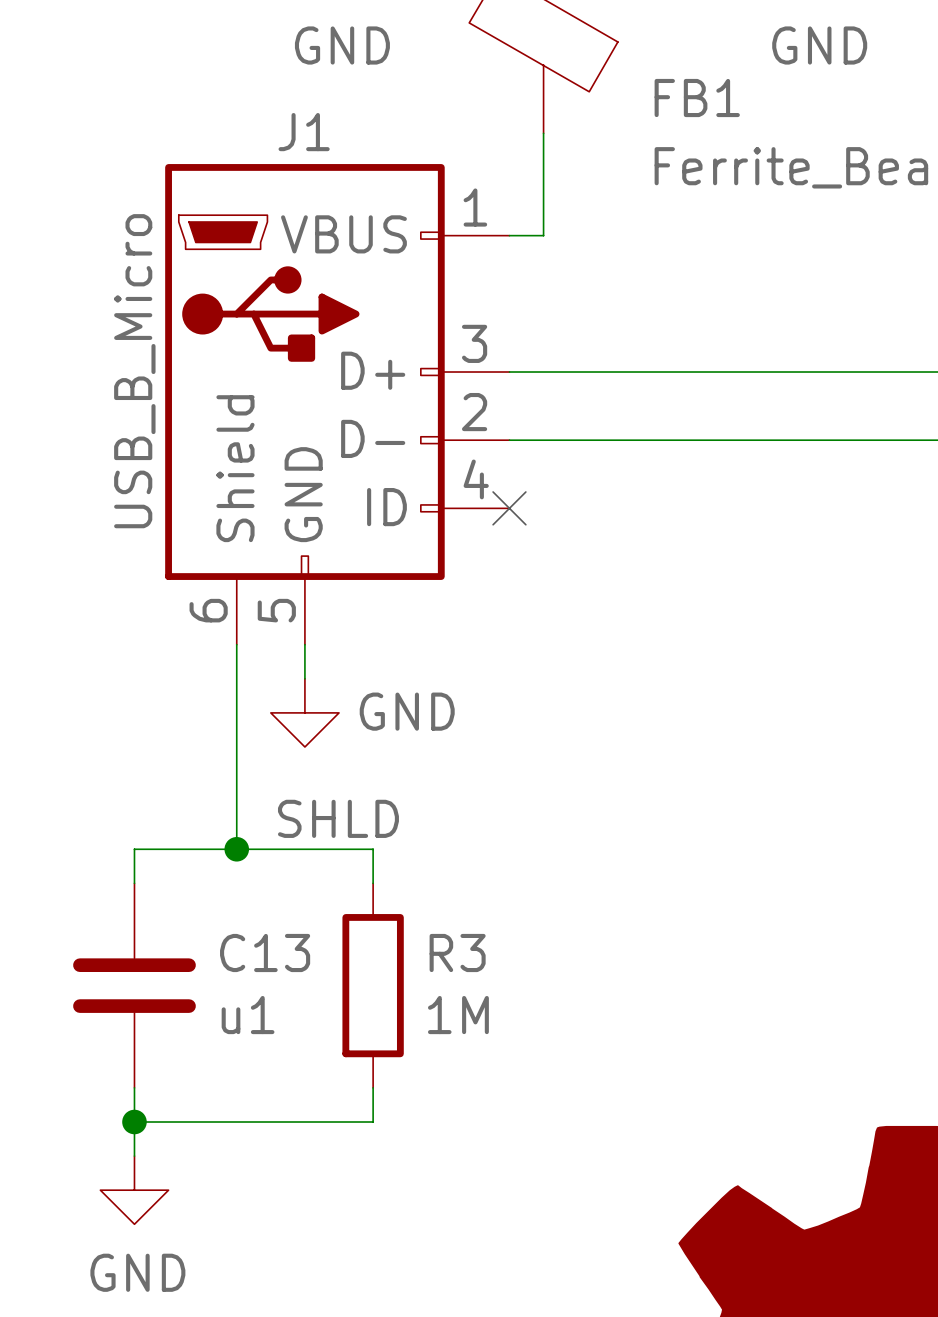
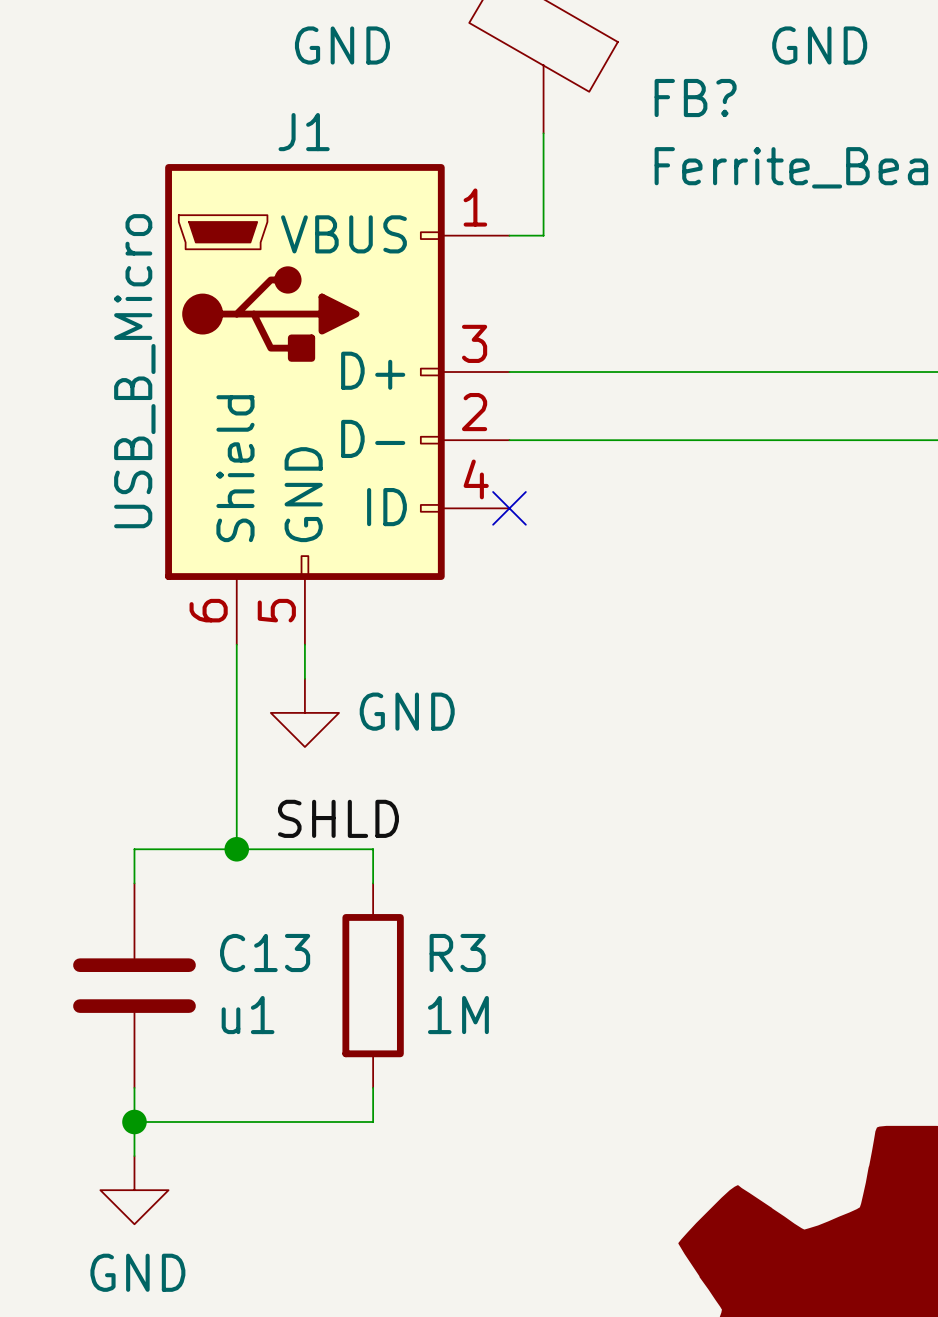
FB1 name: FB1 (697, 98) -> FB? (695, 98)

